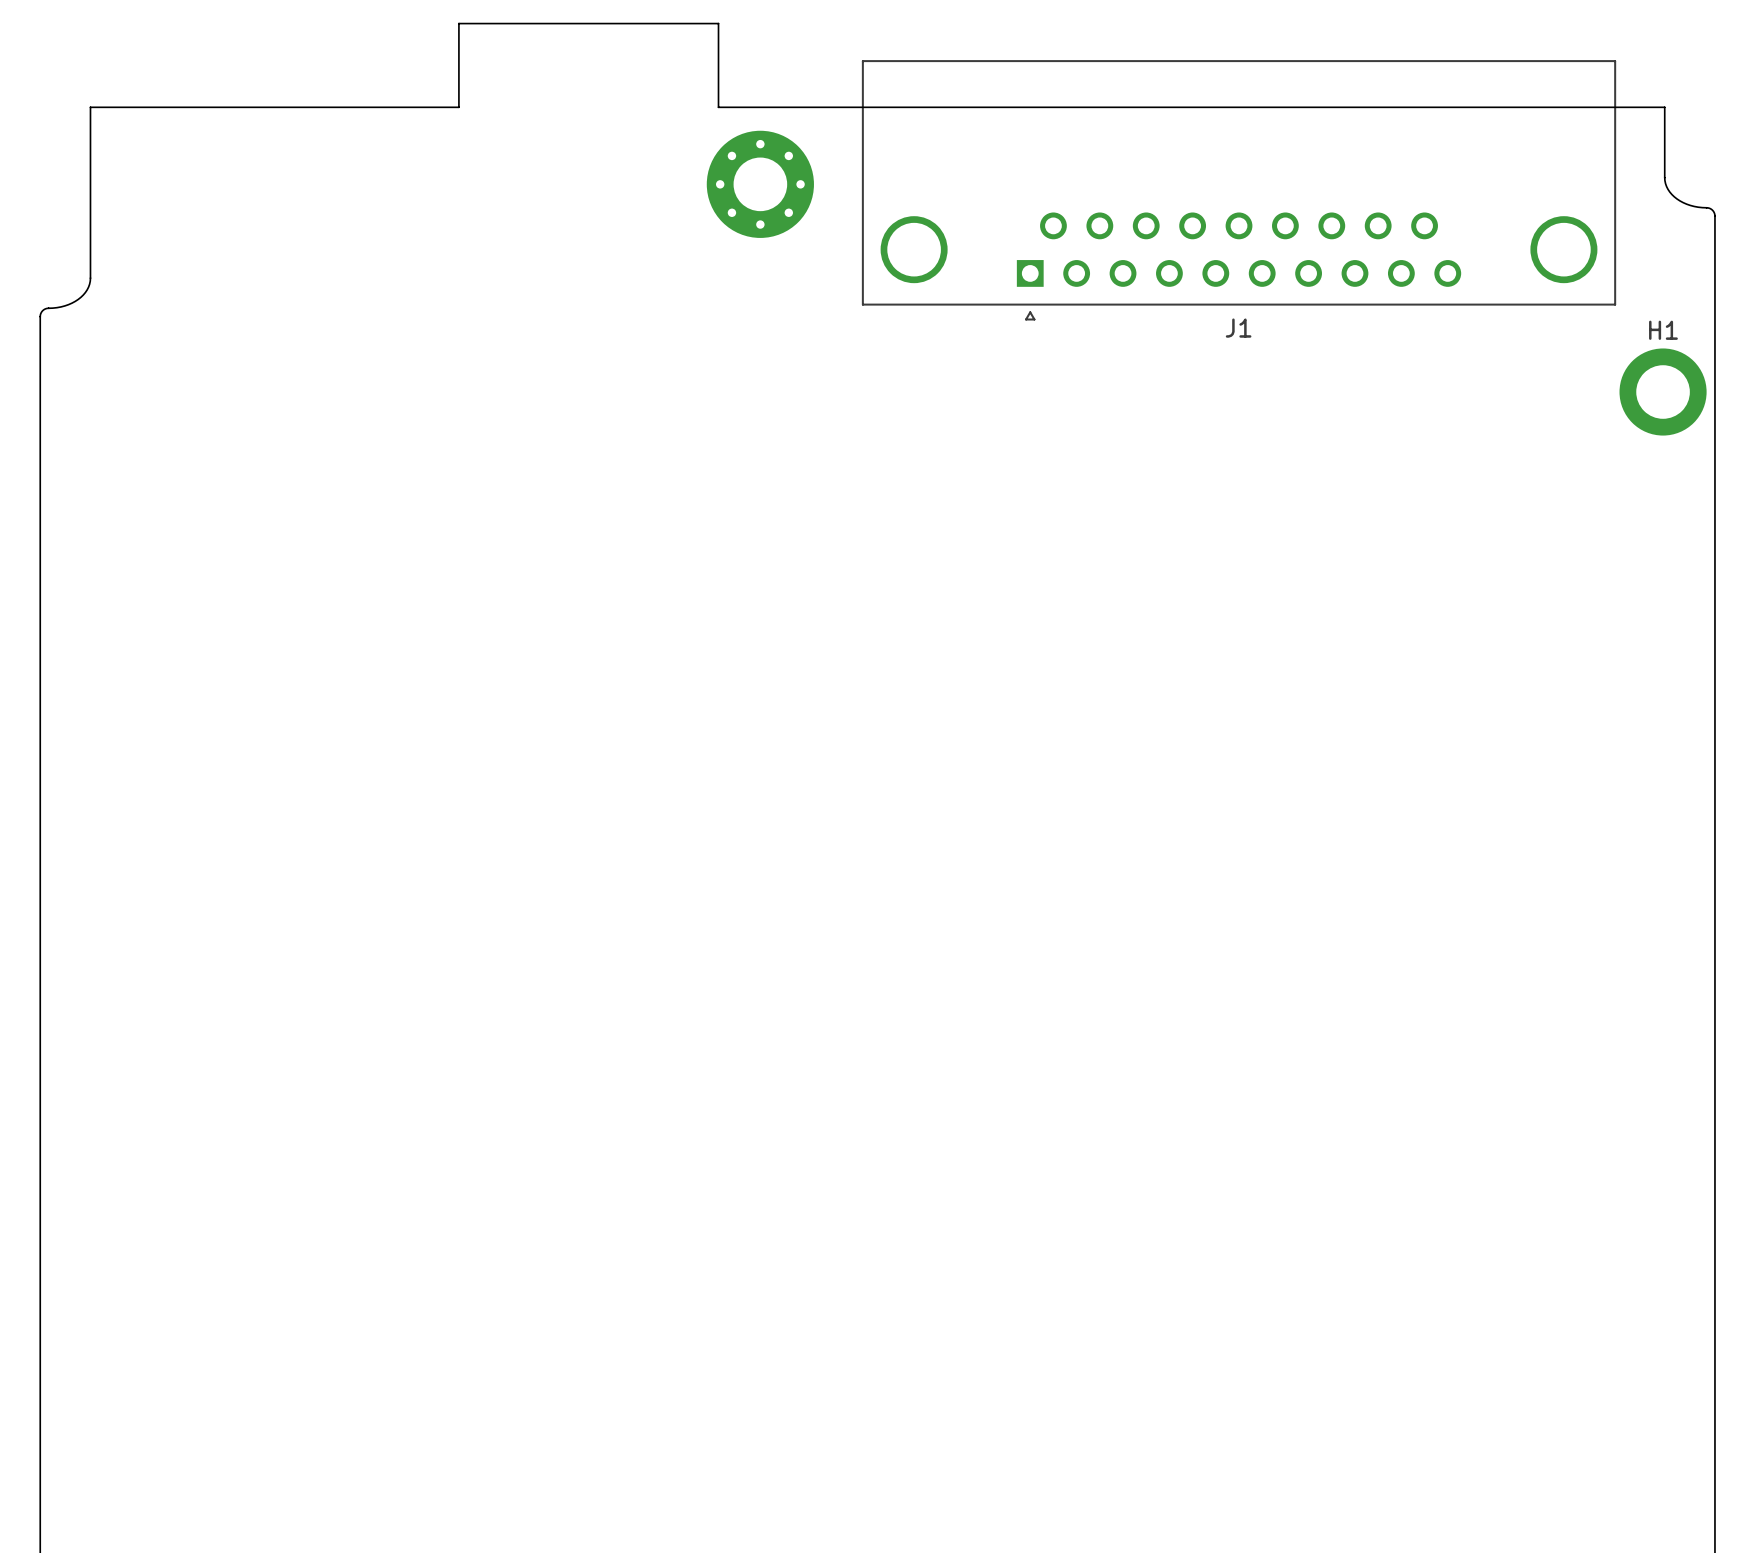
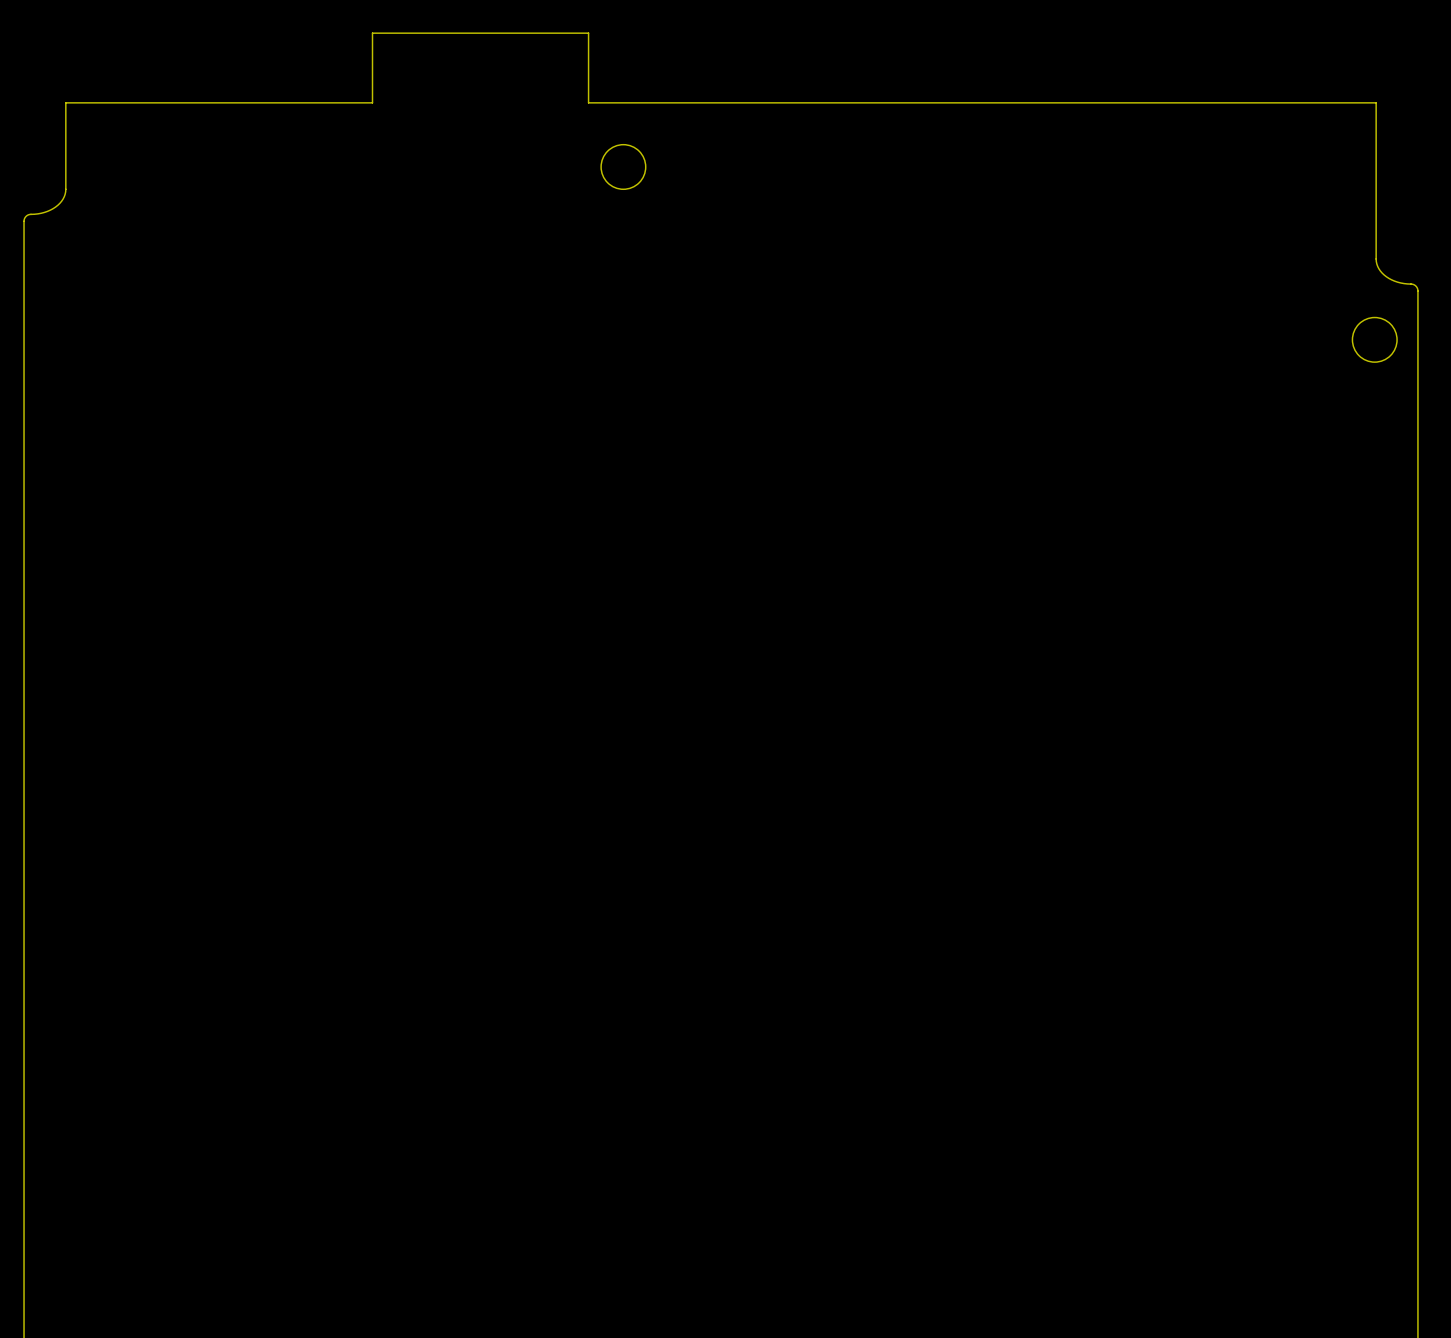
round board edge: none -> [600, 143, 647, 190]
board edge: (1664, 177) (1668, 189) (1676, 198) (1690, 205) (1709, 208) (1714, 213) (1714, 333) -> (1376, 161) (1376, 264) (1386, 276) (1397, 282) (1414, 284) (1417, 291)
part: (760, 184) -> none
J1: (1239, 190) -> none
board edge: (90, 211) (90, 278) (88, 287) (83, 294) (75, 301) (61, 306) (44, 309) (40, 316) -> (65, 189) (63, 199) (55, 207) (44, 212) (28, 214) (24, 218) (24, 277)
round board edge: none -> [1351, 316, 1398, 363]
H1: (1663, 392) -> none

